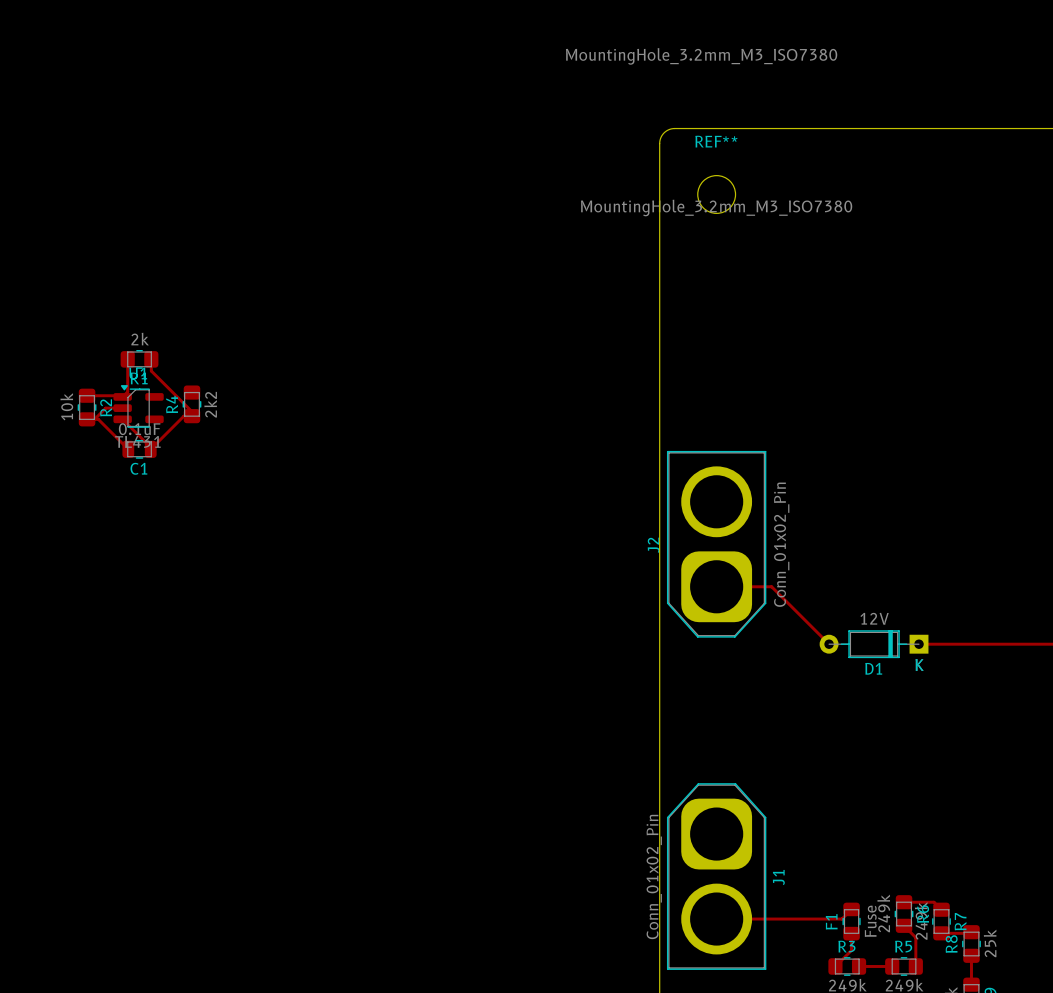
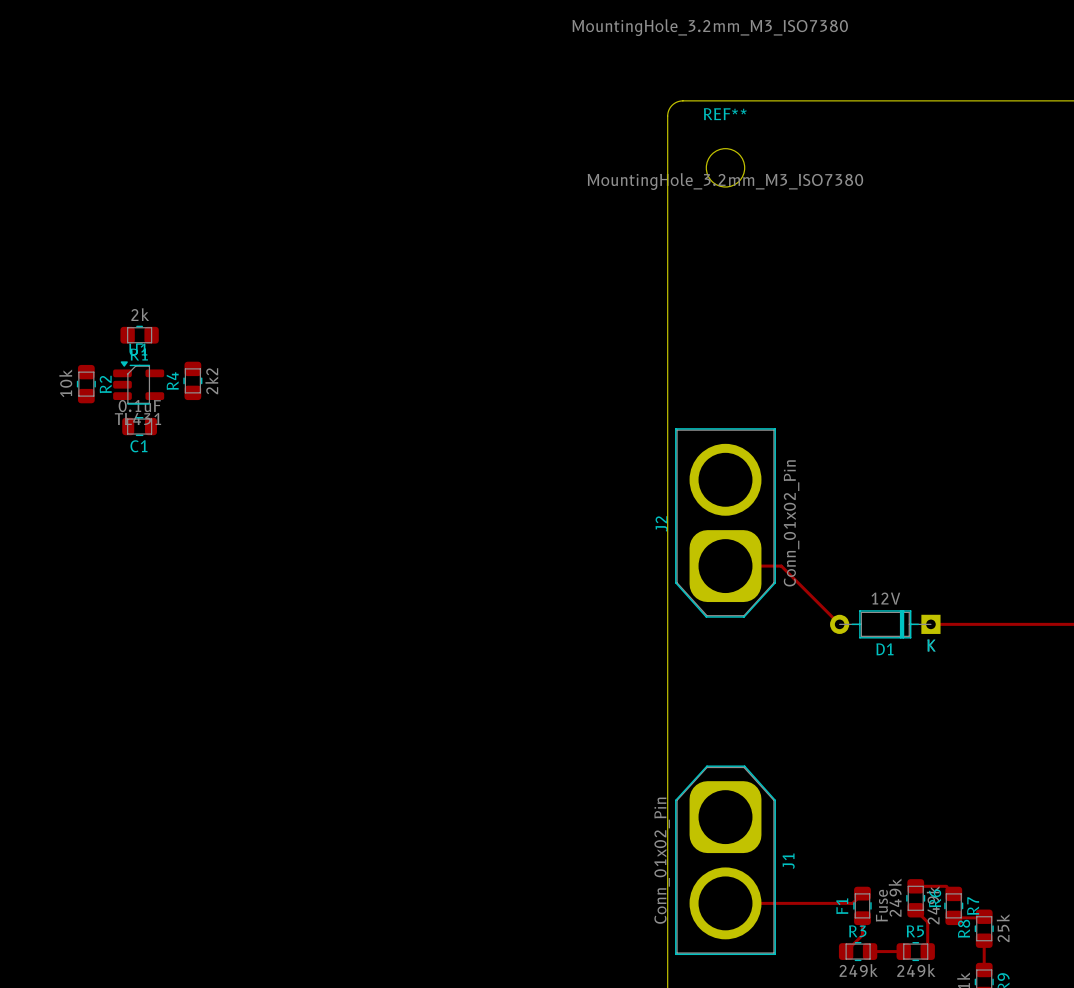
track: (127, 359) (127, 391) (122, 396) (87, 395) -> none
track: (151, 359) (151, 371) (191, 411) (191, 416) (183, 416) (150, 449) (122, 419) -> none
track: (122, 408) (105, 408) (94, 419) -> none
track: (87, 419) (98, 419) (128, 449) -> none

